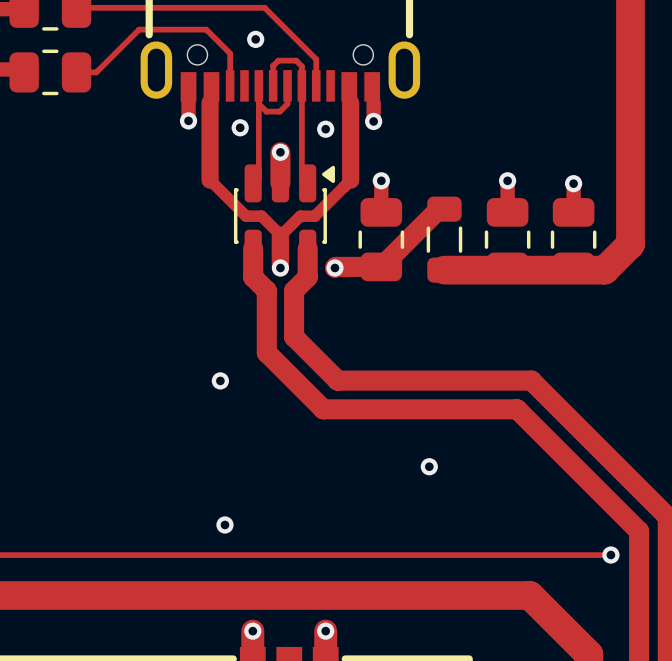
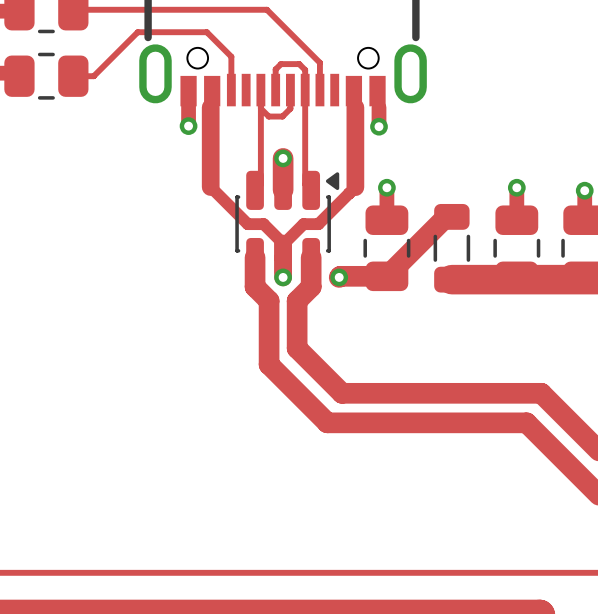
via: (255, 39) -> none
via: (240, 127) -> none
via: (325, 129) -> none
via: (220, 380) -> none
via: (429, 466) -> none
via: (224, 524) -> none

